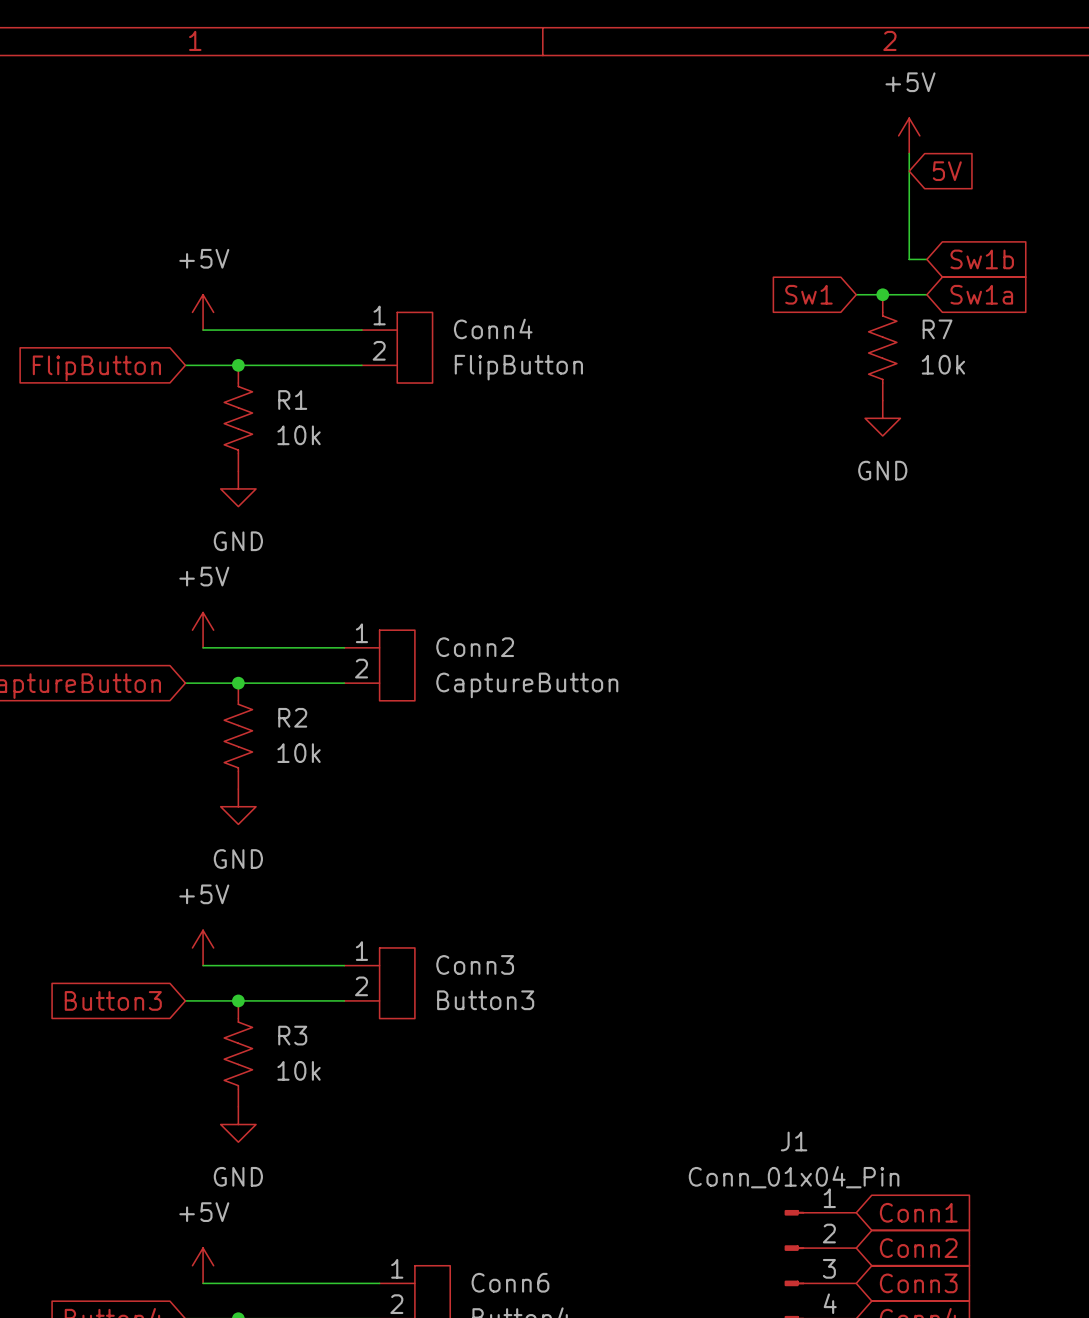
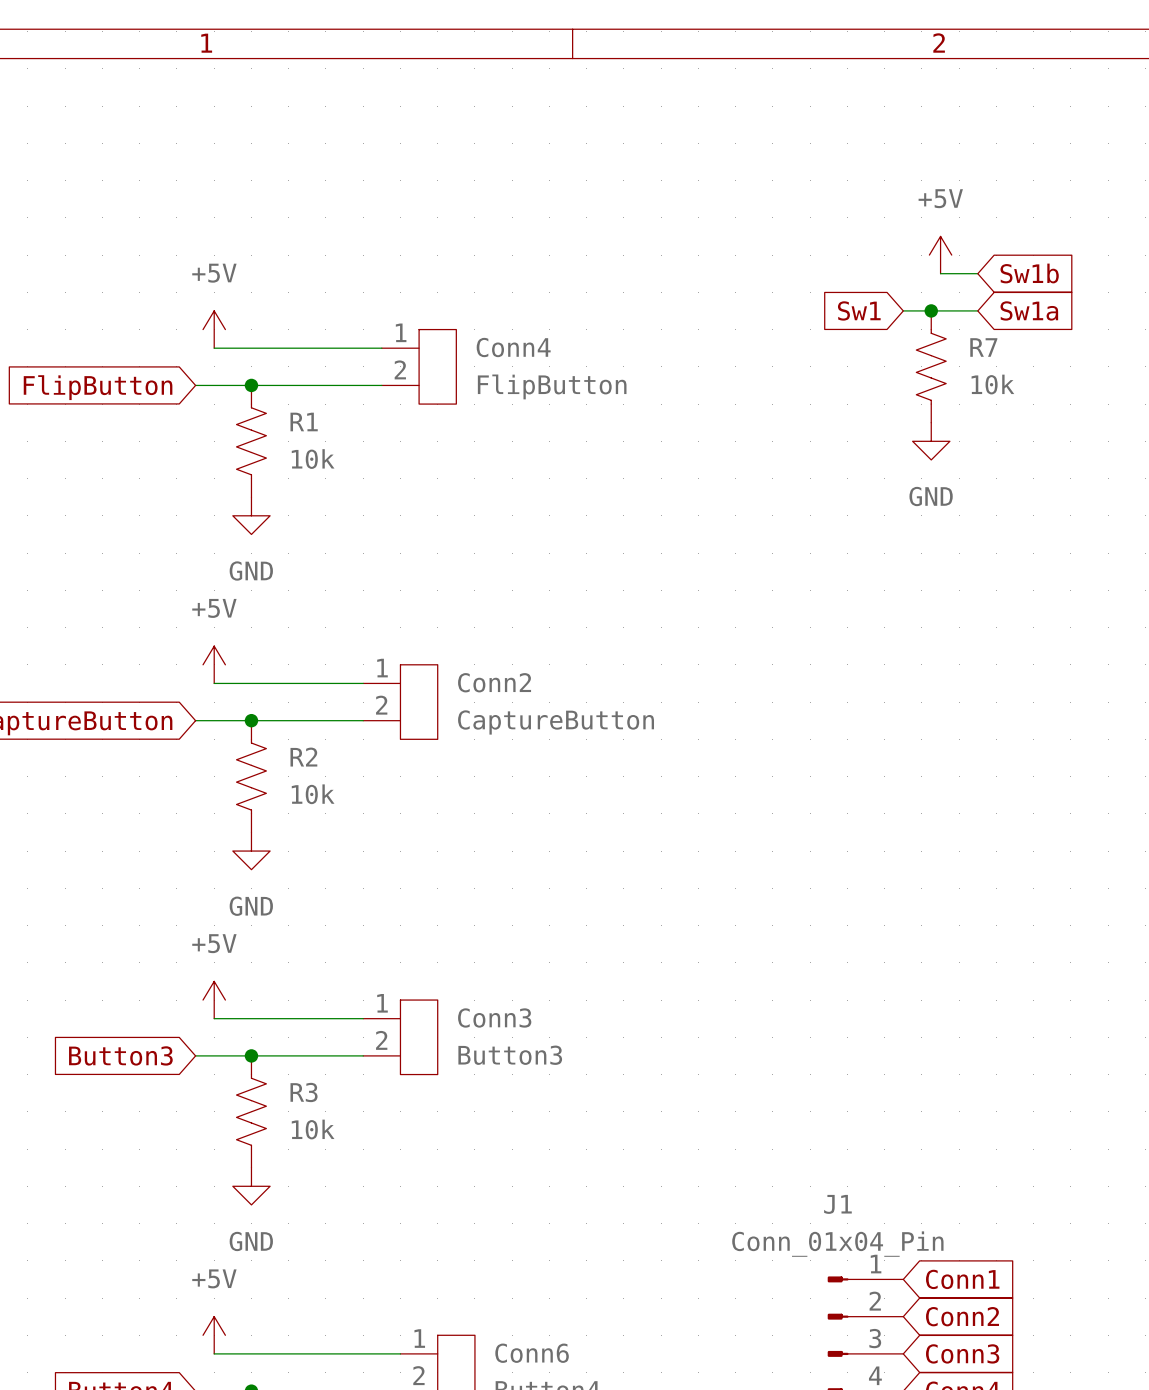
power symbol position: +5V (909, 135) -> +5V (940, 255)
wire: (909, 153) (909, 259) -> (940, 273) (959, 273)
global label: 5V (947, 171) -> none

